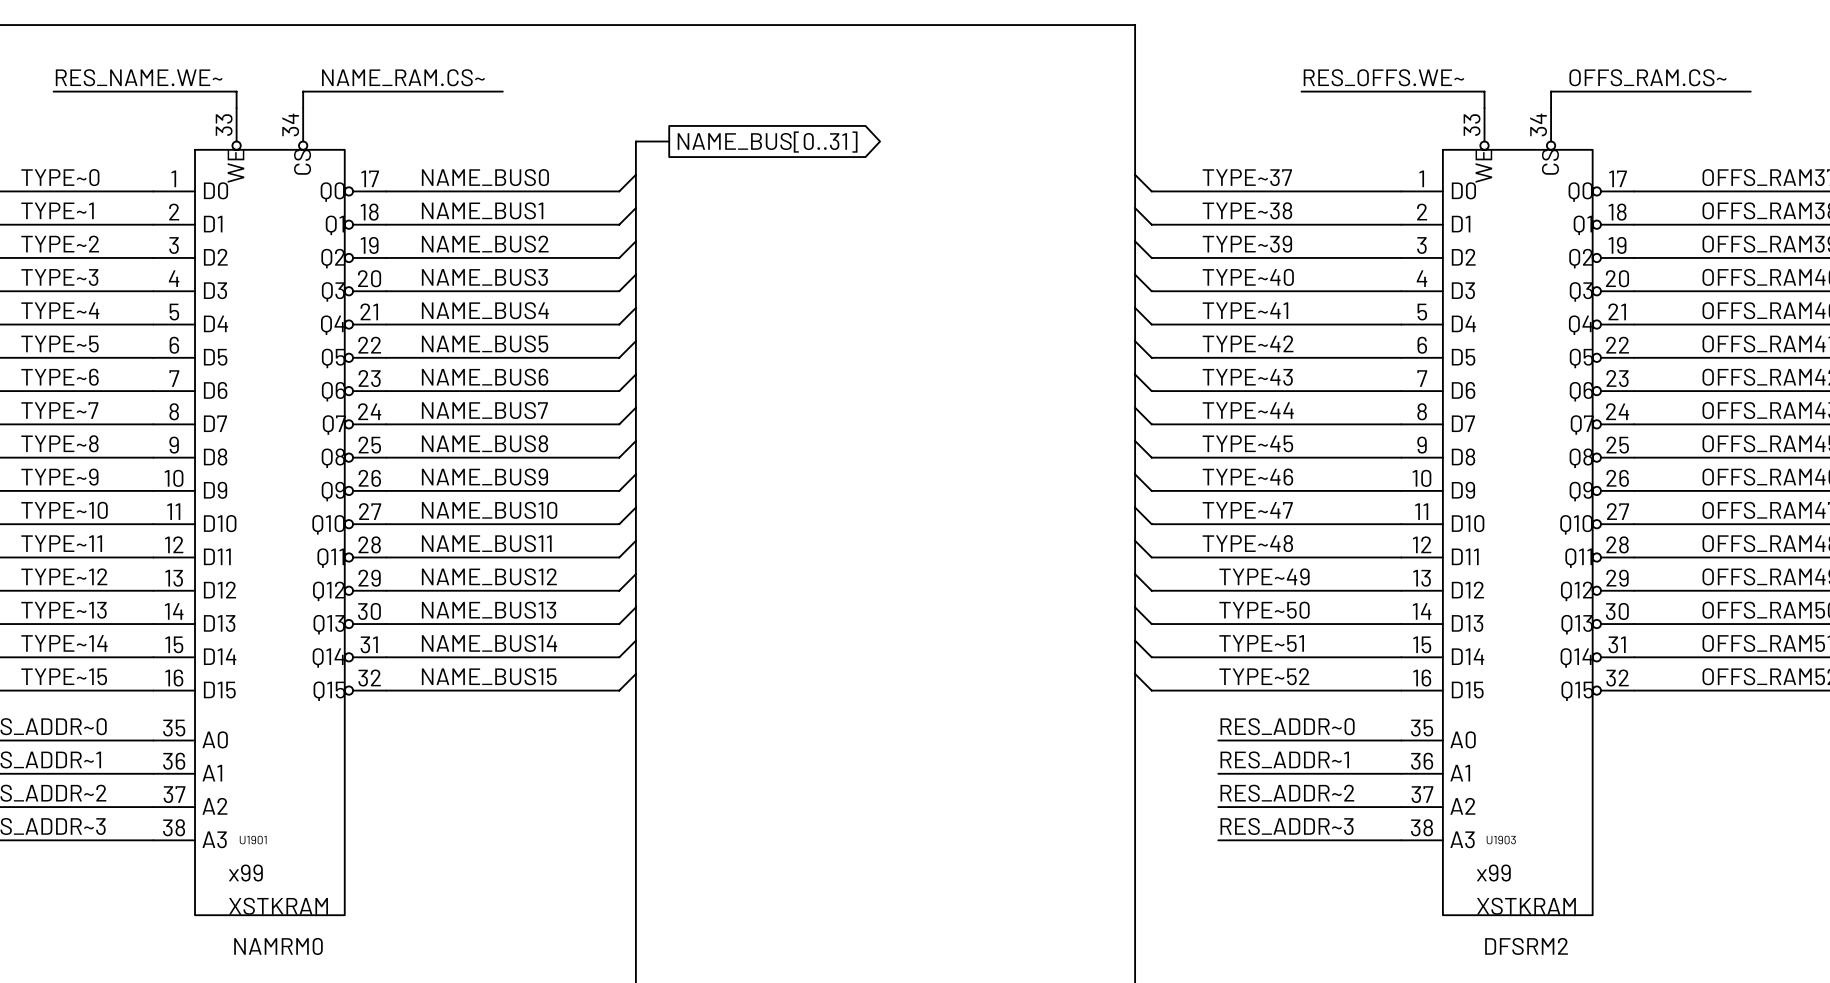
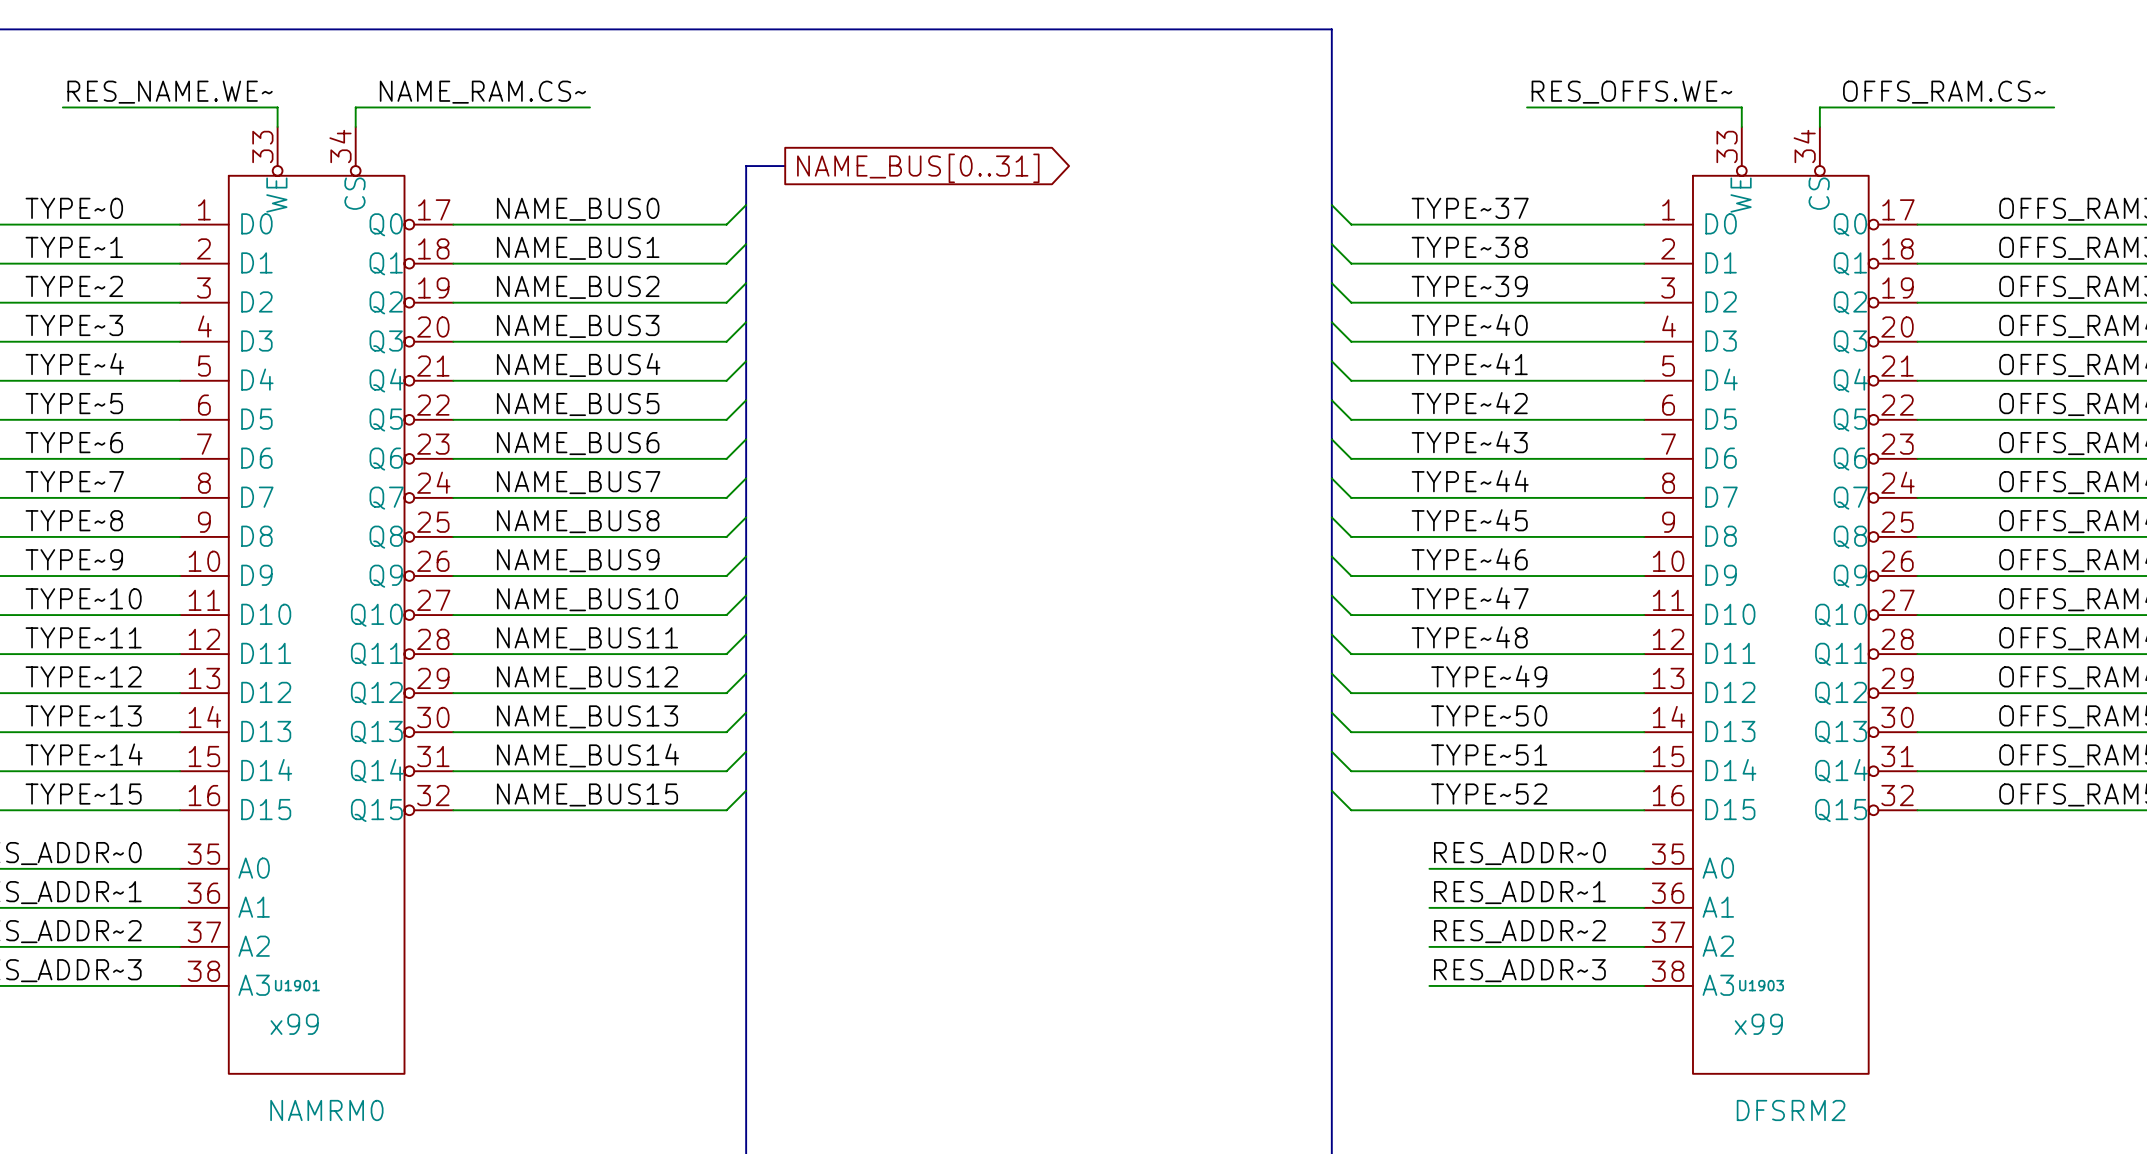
U1901 value: XSTKRAM (278, 906) -> none
U1903 value: XSTKRAM (1526, 906) -> none

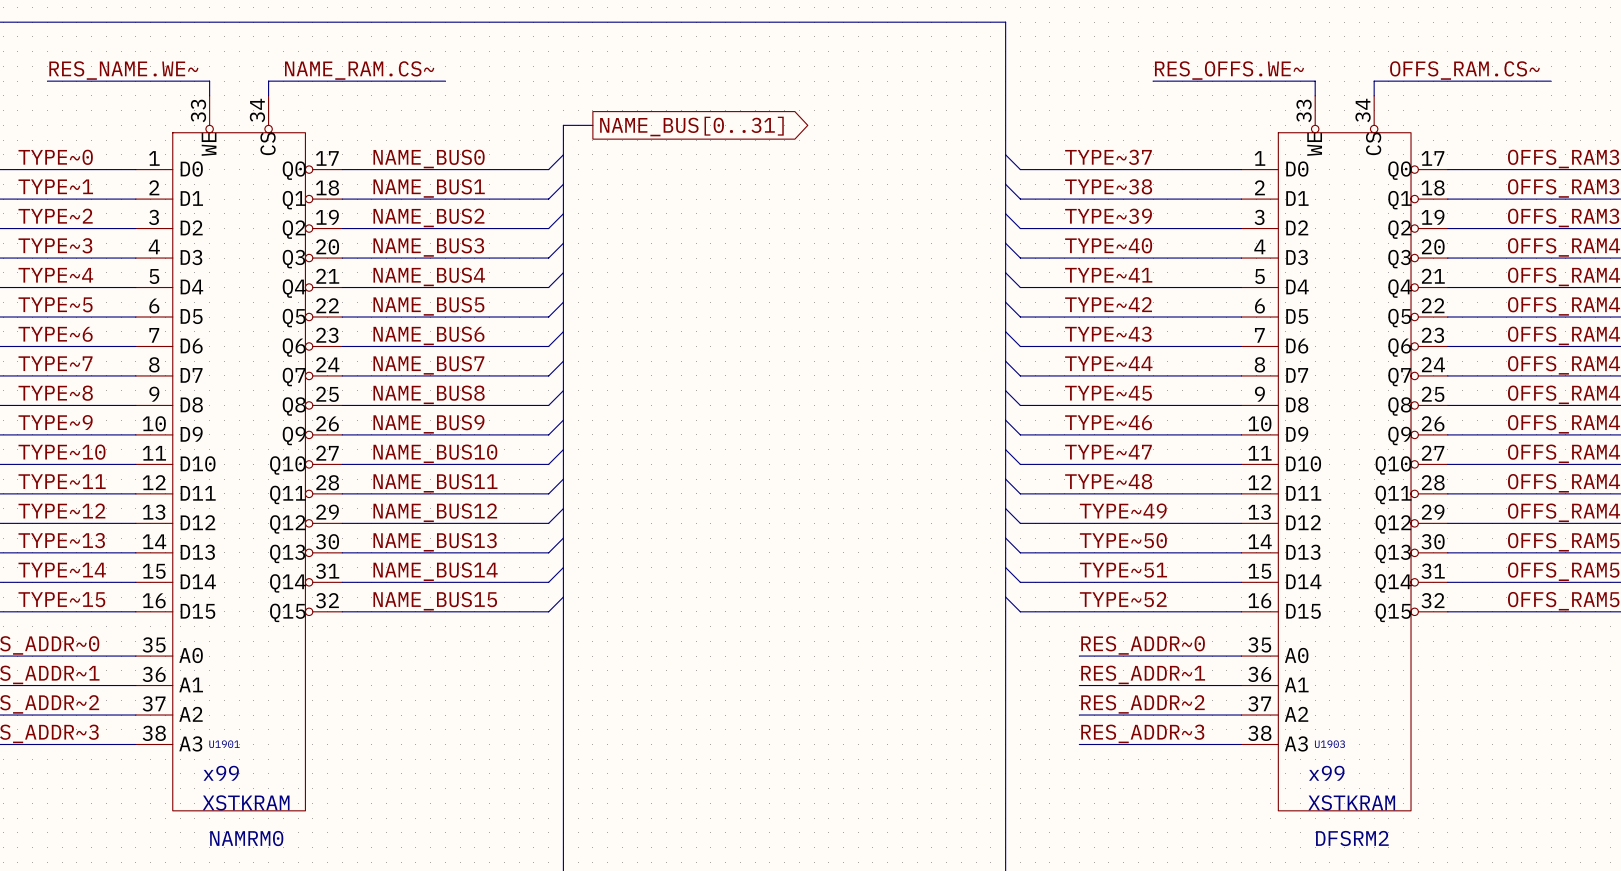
U1901 value: none -> XSTKRAM (246, 802)
U1903 value: none -> XSTKRAM (1351, 802)

